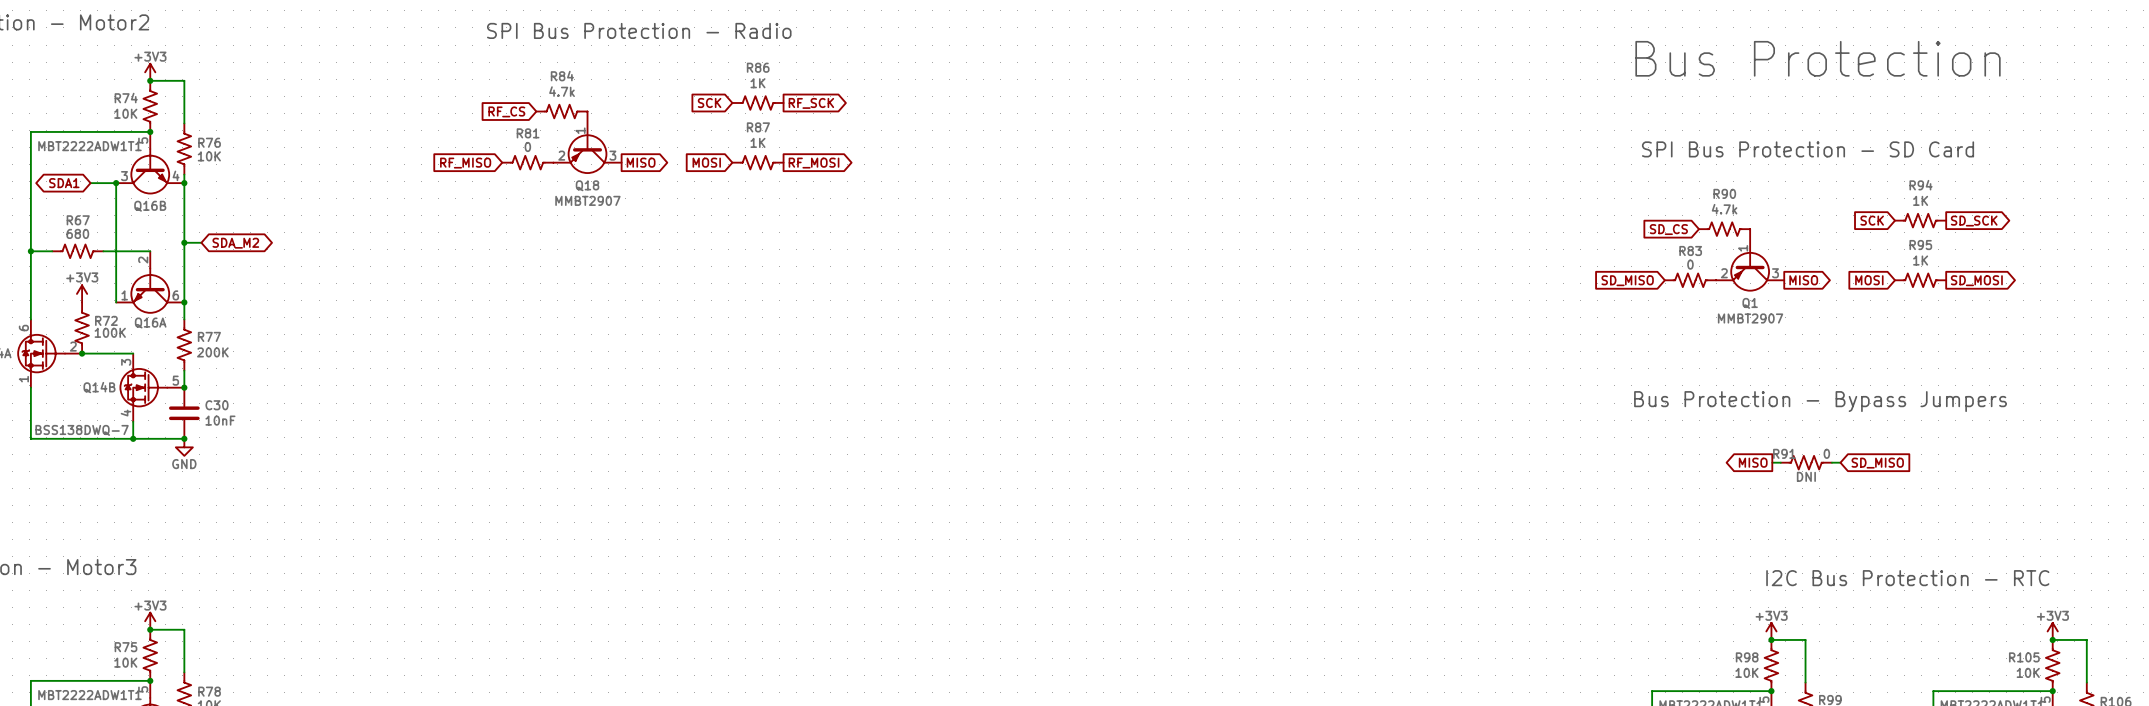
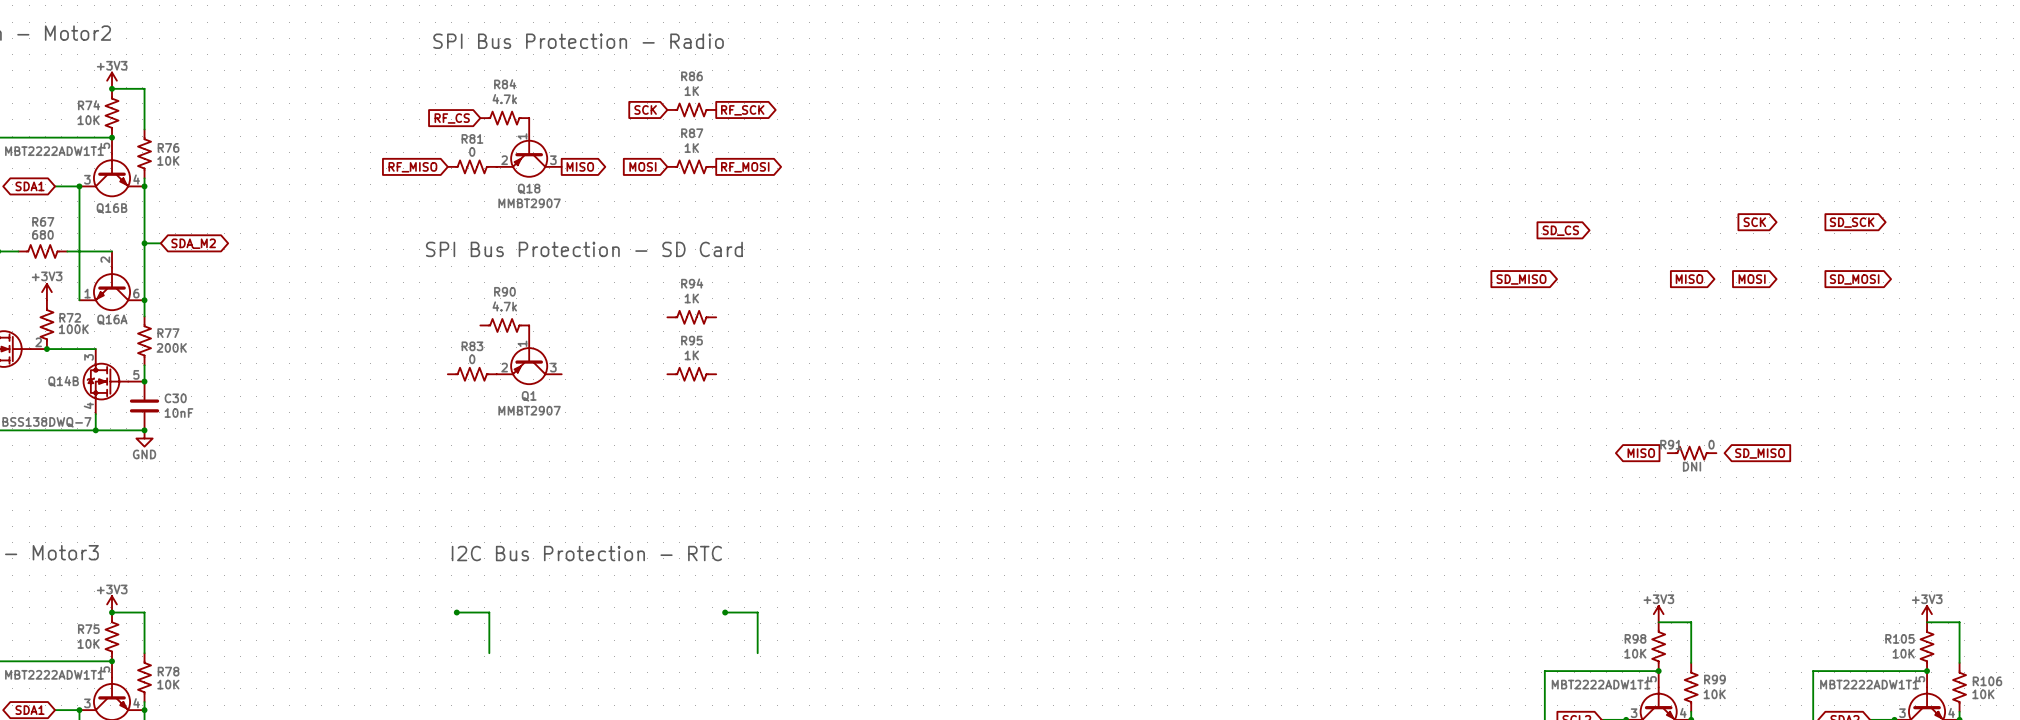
text: Bus Protection (1818, 58) -> none
text: SPI Bus Protection - SD Card (1808, 149) -> none
R94 position: (1920, 220) -> (691, 317)
R90 position: (1724, 229) -> (504, 325)
text: none -> SPI Bus Protection - SD Card (584, 249)
Q1 position: (1750, 260) -> (529, 355)
R83 position: (1690, 280) -> (472, 374)
R95 position: (1920, 280) -> (691, 374)
text: Bus Protection - Bypass Jumpers (1820, 401) -> none
wire: (1772, 462) (1780, 462) -> none
wire: (1831, 462) (1840, 462) -> none
text: none -> I2C Bus Protection - RTC (586, 553)
text: I2C Bus Protection - RTC (1907, 578) -> none
wire: none -> (456, 612) (489, 612) (489, 653)
junction: none -> (456, 612)
wire: none -> (725, 612) (757, 612) (757, 653)
junction: none -> (725, 612)
junction: (1771, 639) -> none
junction: (2052, 639) -> none

